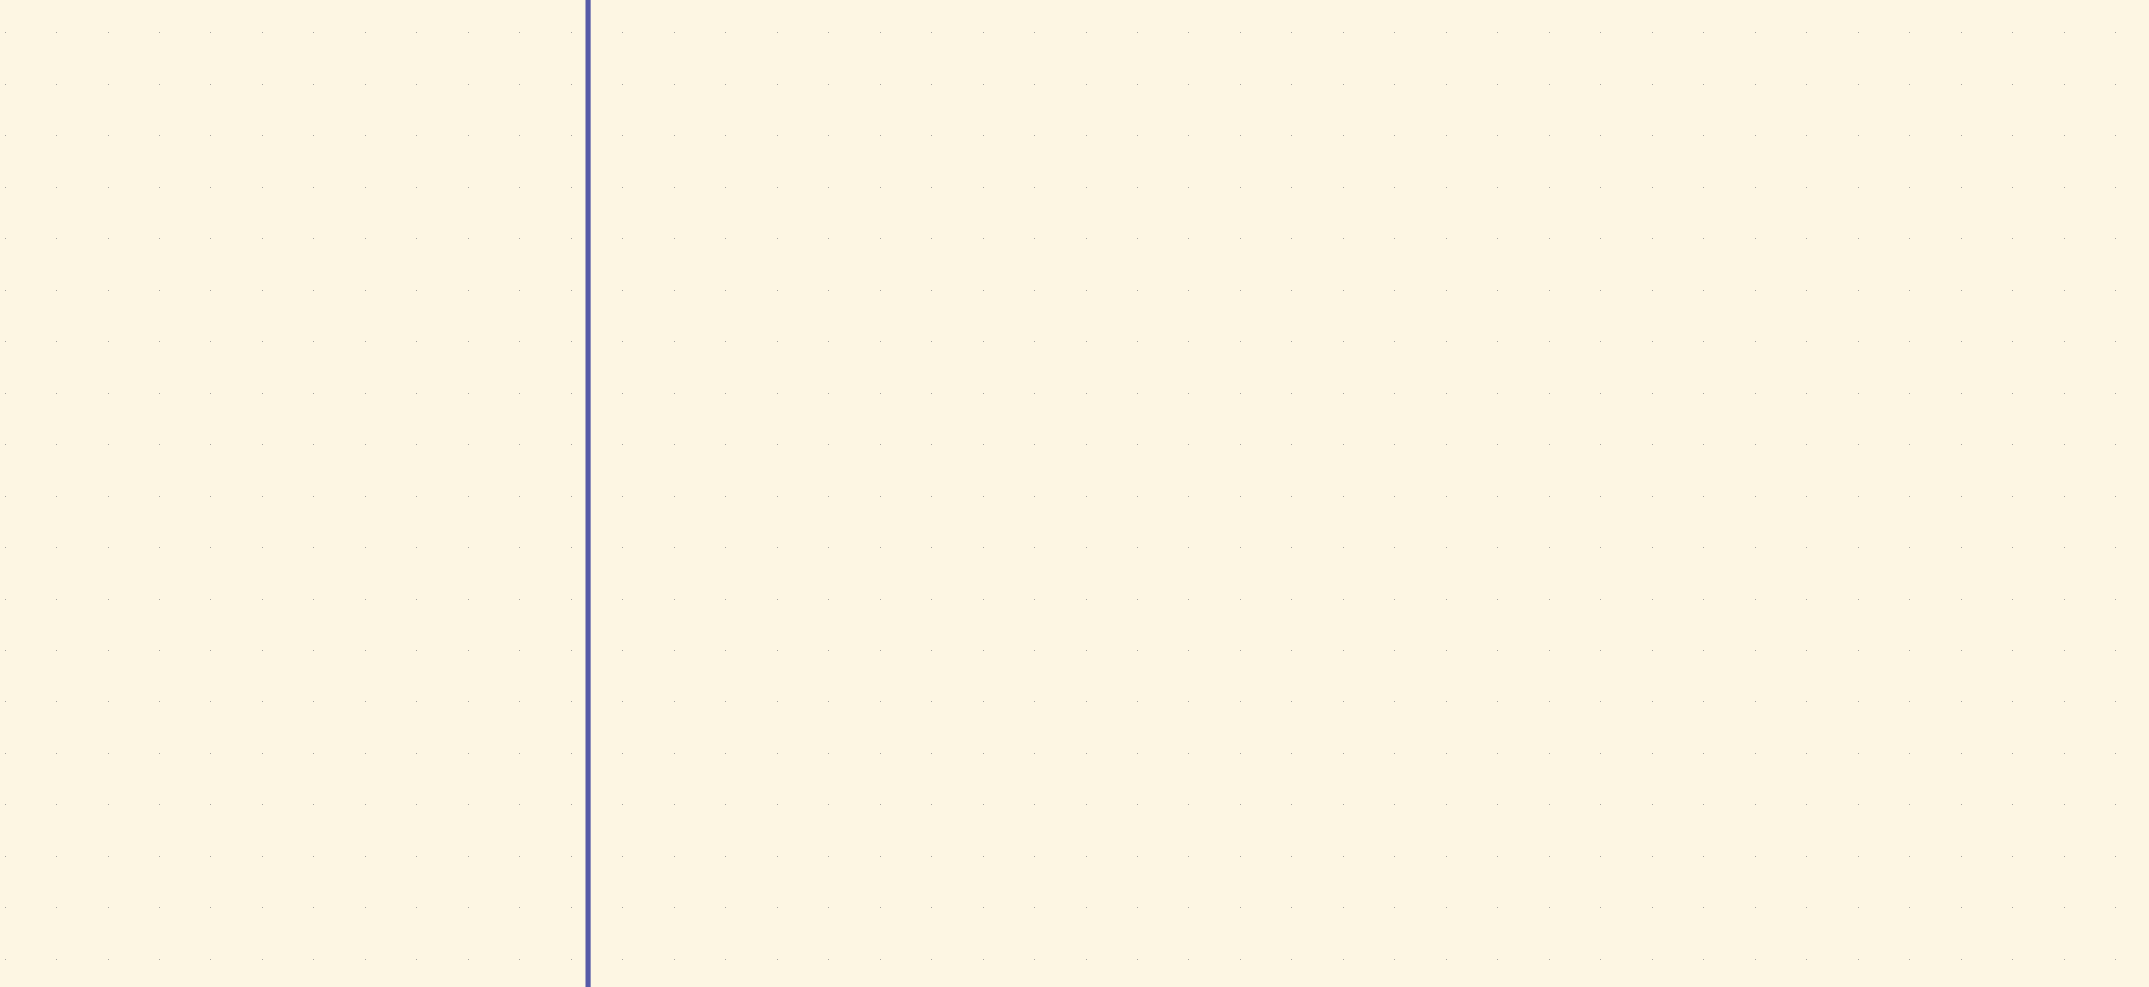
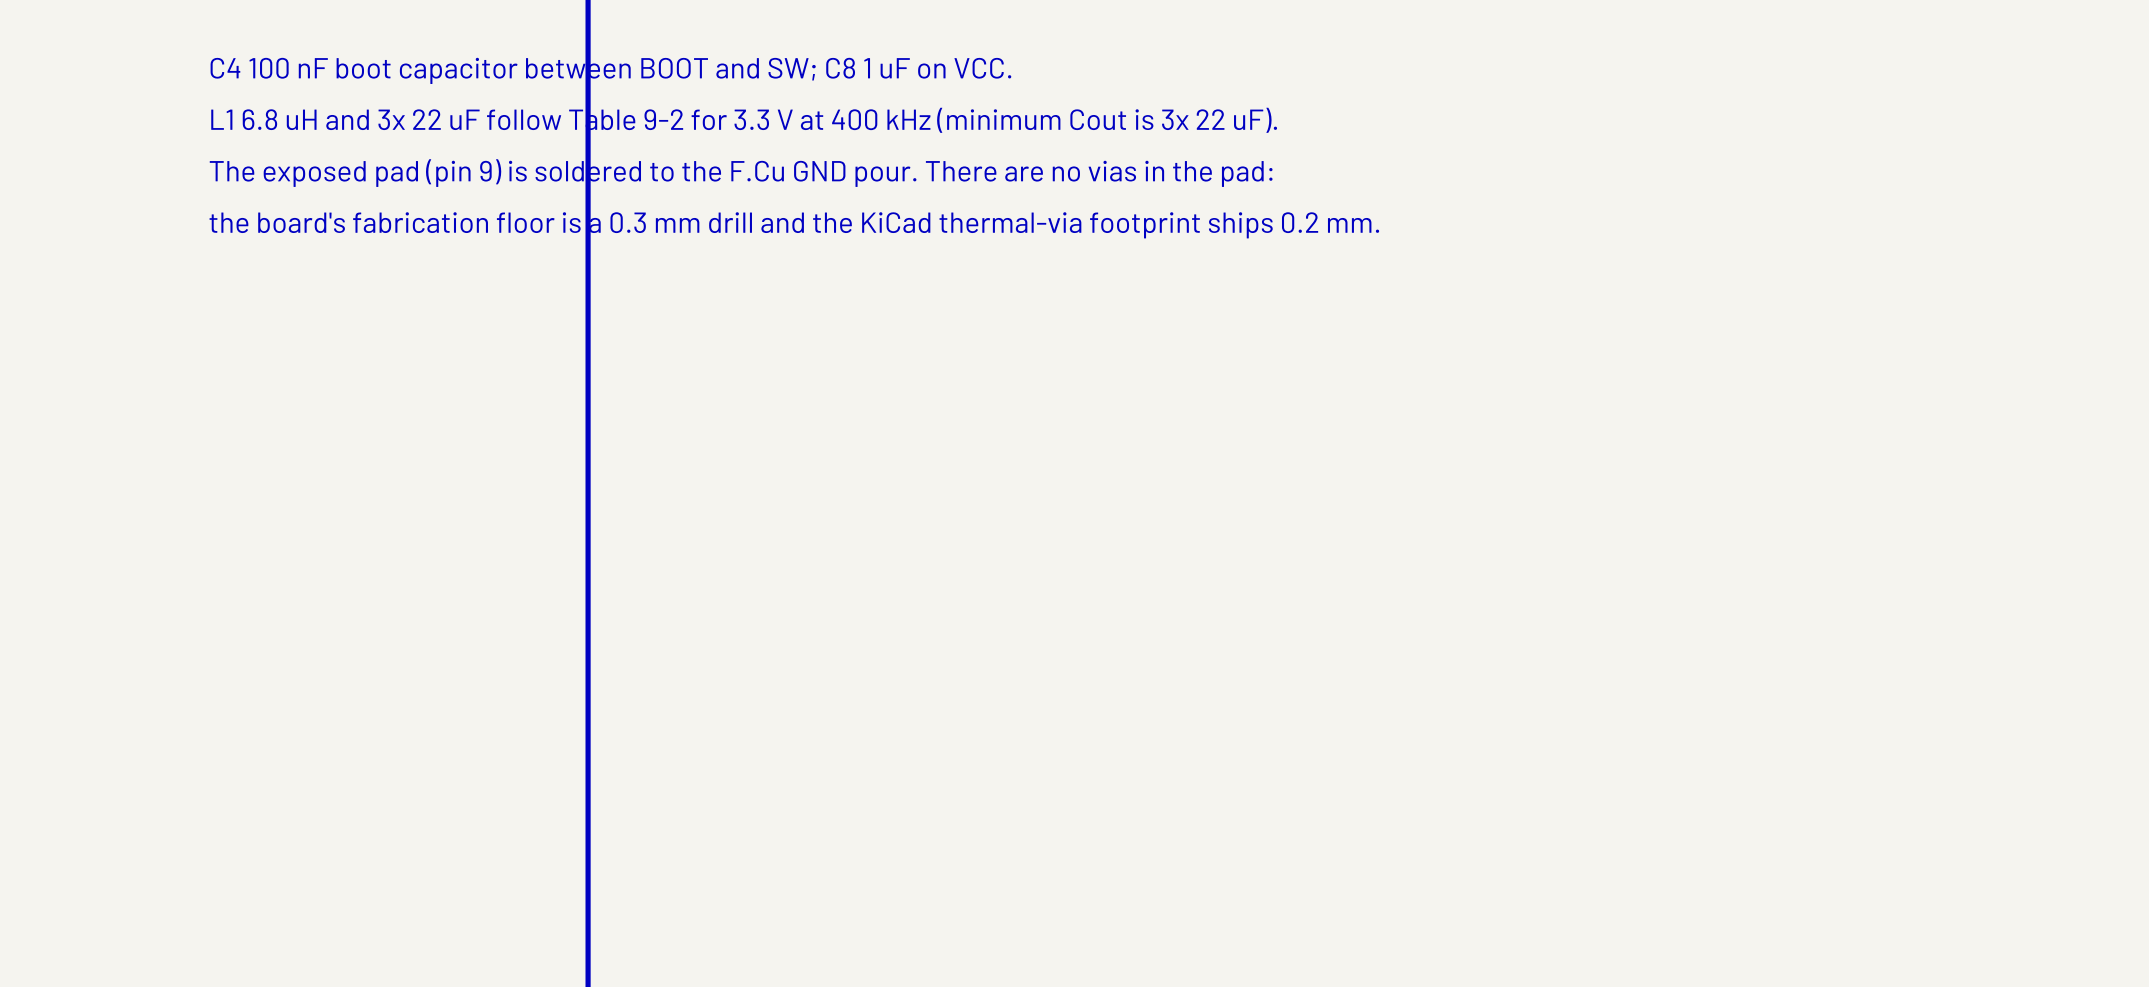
text: none -> C4 100 nF boot capacitor between BOOT and SW; C8 1 uF on VCC. (610, 70)
text: none -> L1 6.8 uH and 3x 22 uF follow Table 9-2 for 3.3 V at 400 kHz (minimum Cout is 3x 22 uF). (744, 120)
text: none -> The exposed pad (pin 9) is soldered to the F.Cu GND pour. There are no vias in the pad: (741, 173)
text: none -> the board's fabrication floor is a 0.3 mm drill and the KiCad thermal-via footprint ships 0.2 mm. (794, 225)

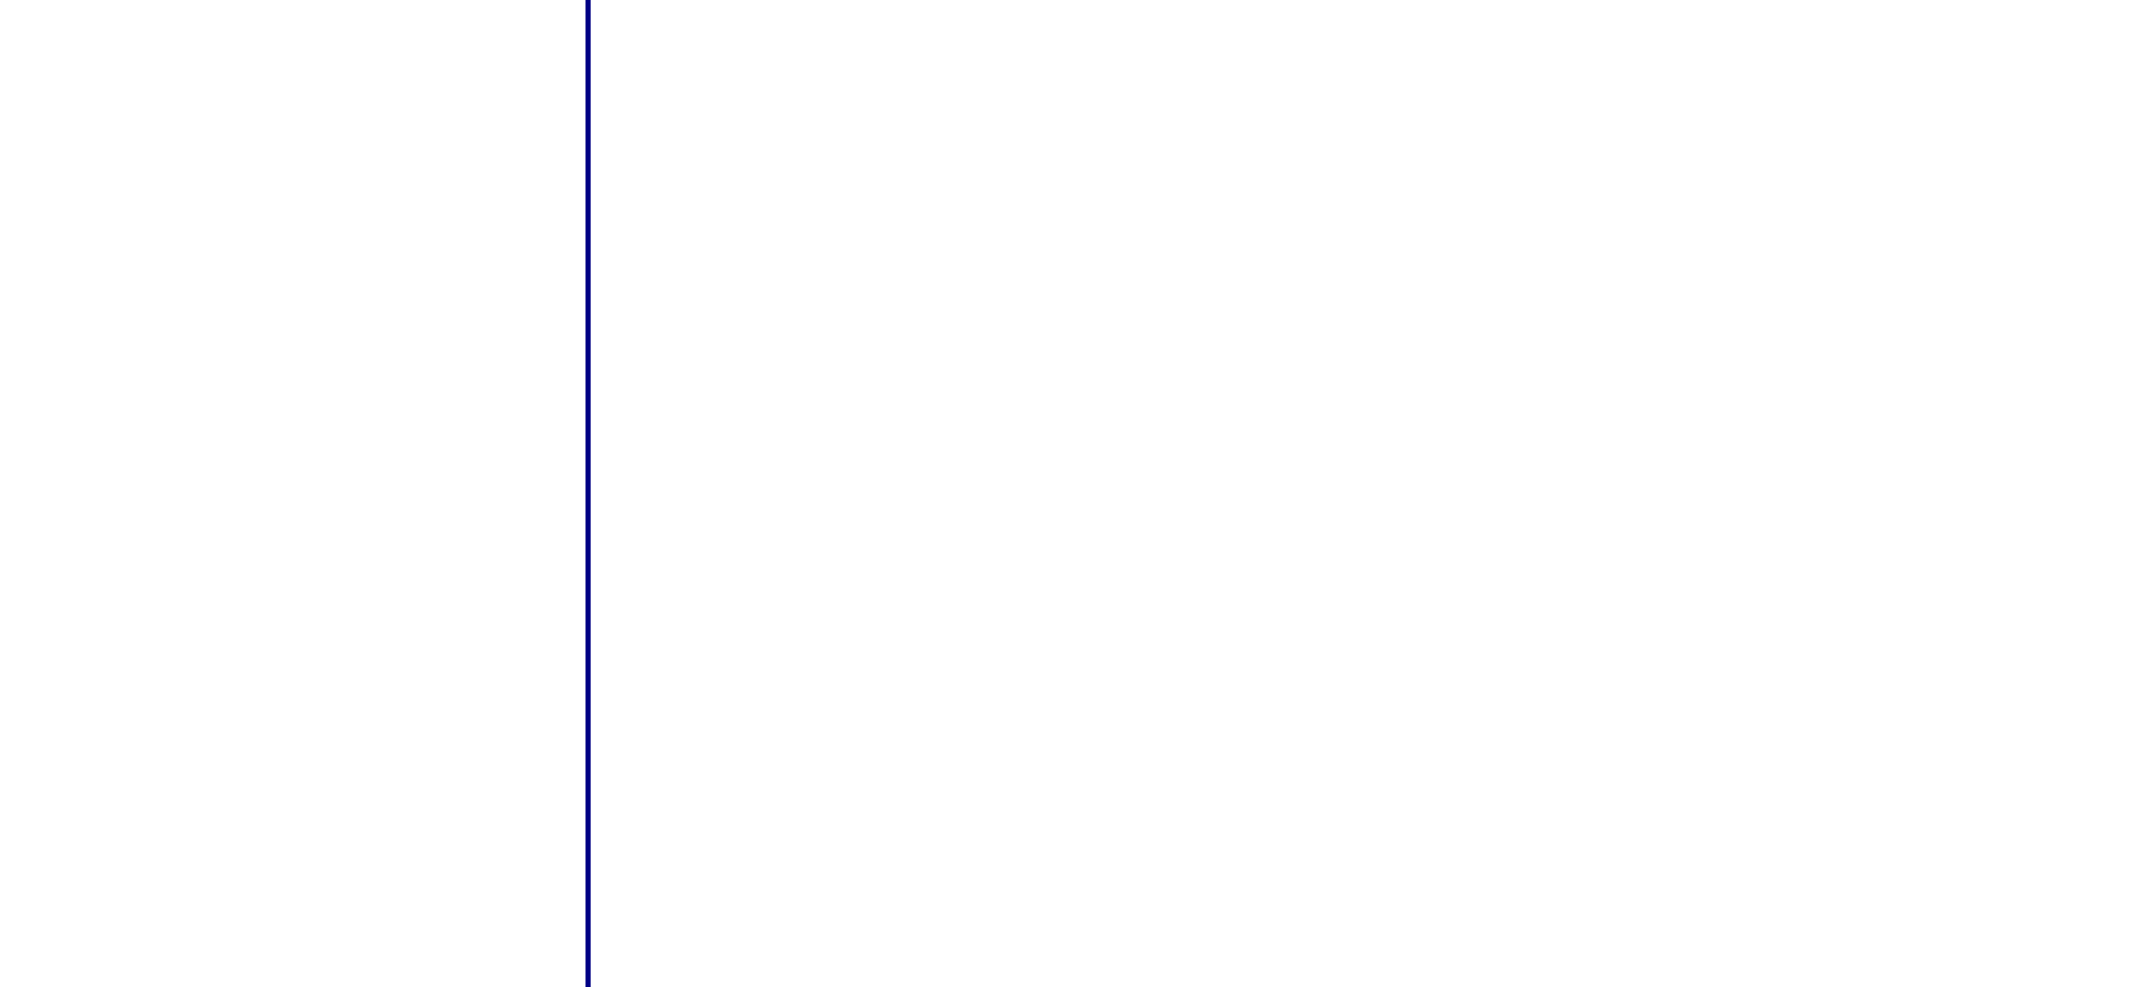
text: C4 100 nF boot capacitor between BOOT and SW; C8 1 uF on VCC. (610, 70) -> none
text: L1 6.8 uH and 3x 22 uF follow Table 9-2 for 3.3 V at 400 kHz (minimum Cout is 3x 22 uF). (744, 120) -> none
text: The exposed pad (pin 9) is soldered to the F.Cu GND pour. There are no vias in the pad: (741, 173) -> none
text: the board's fabrication floor is a 0.3 mm drill and the KiCad thermal-via footprint ships 0.2 mm. (794, 225) -> none

